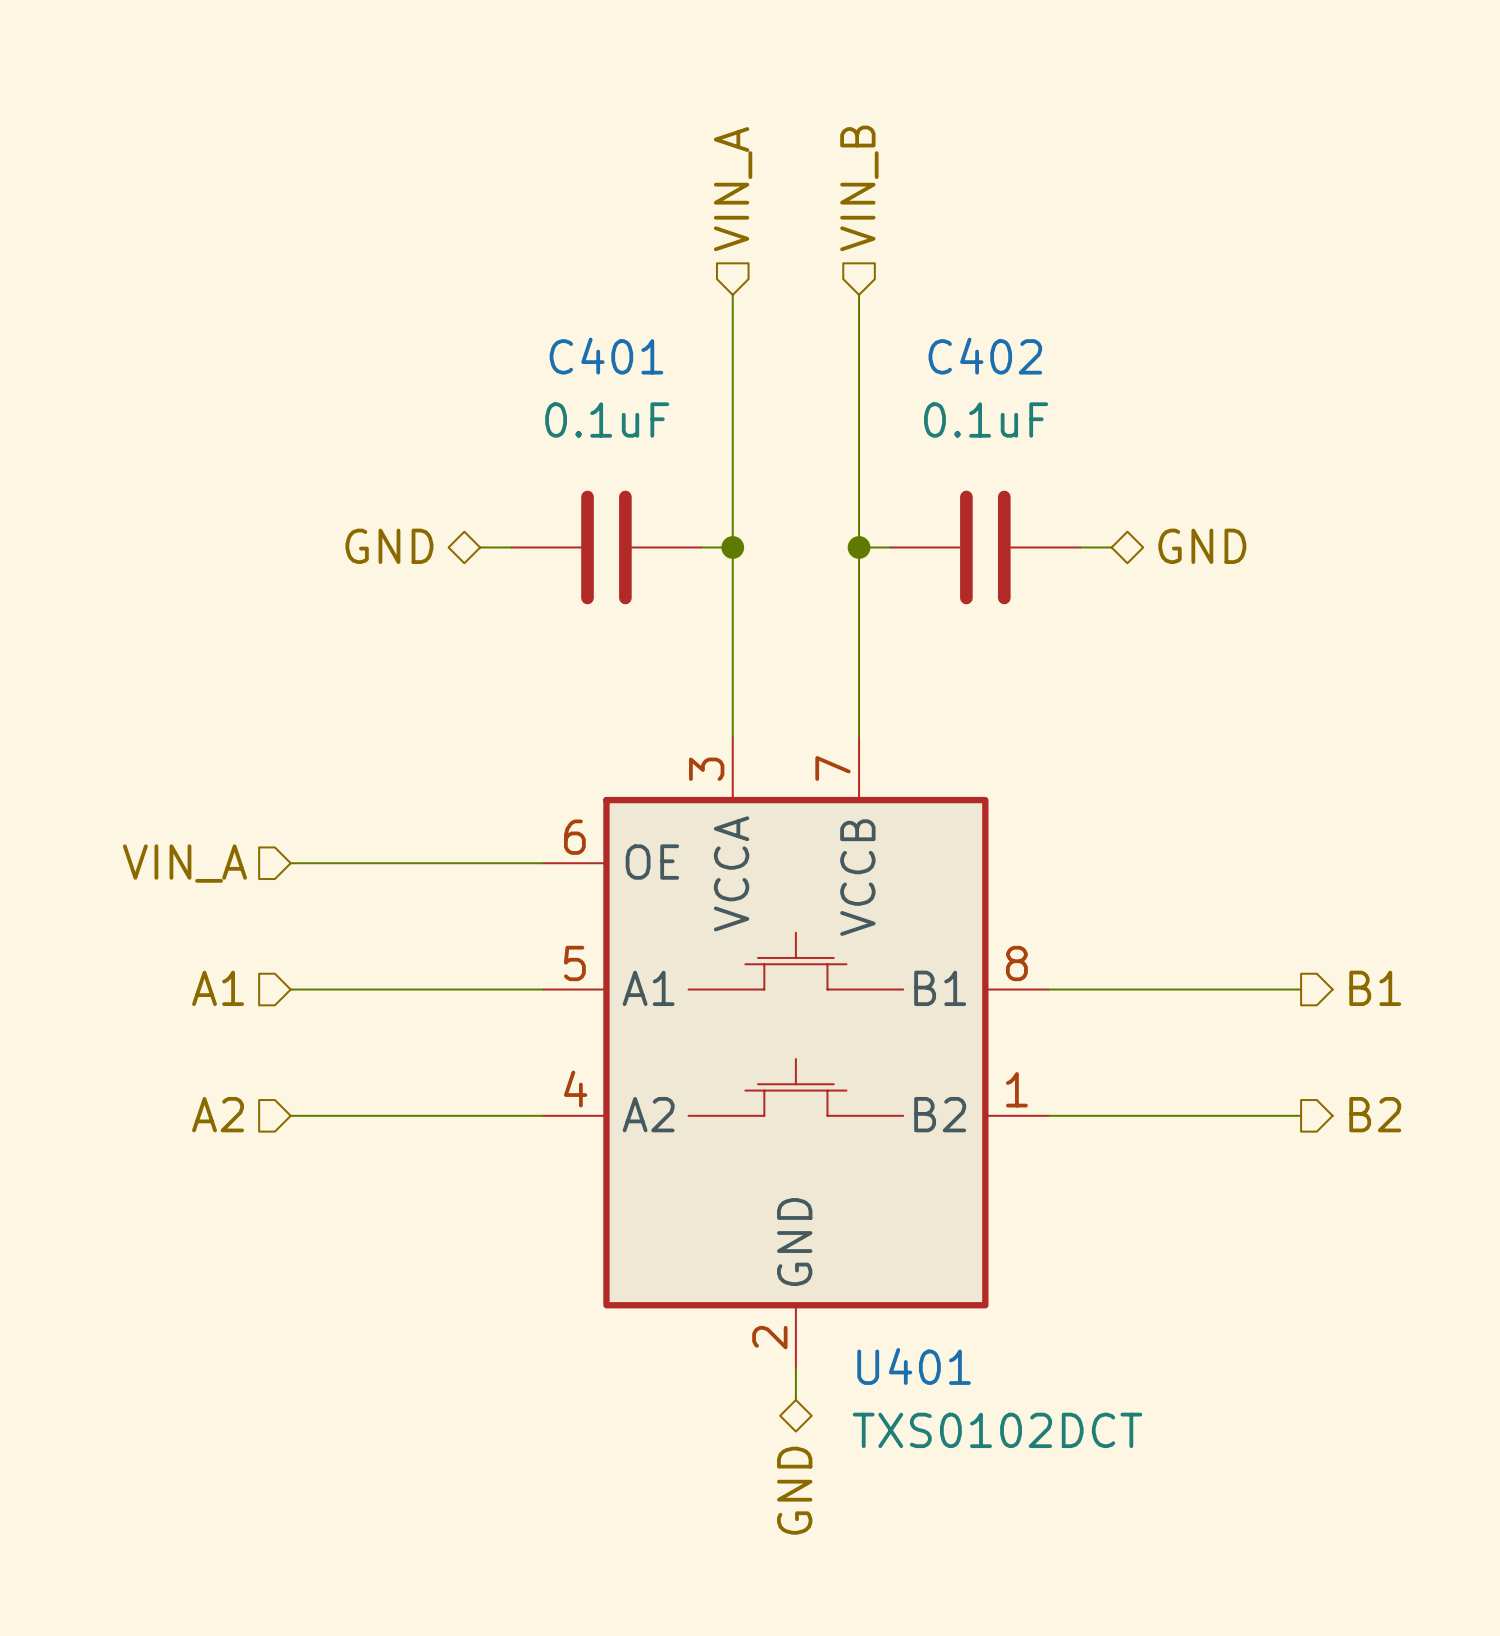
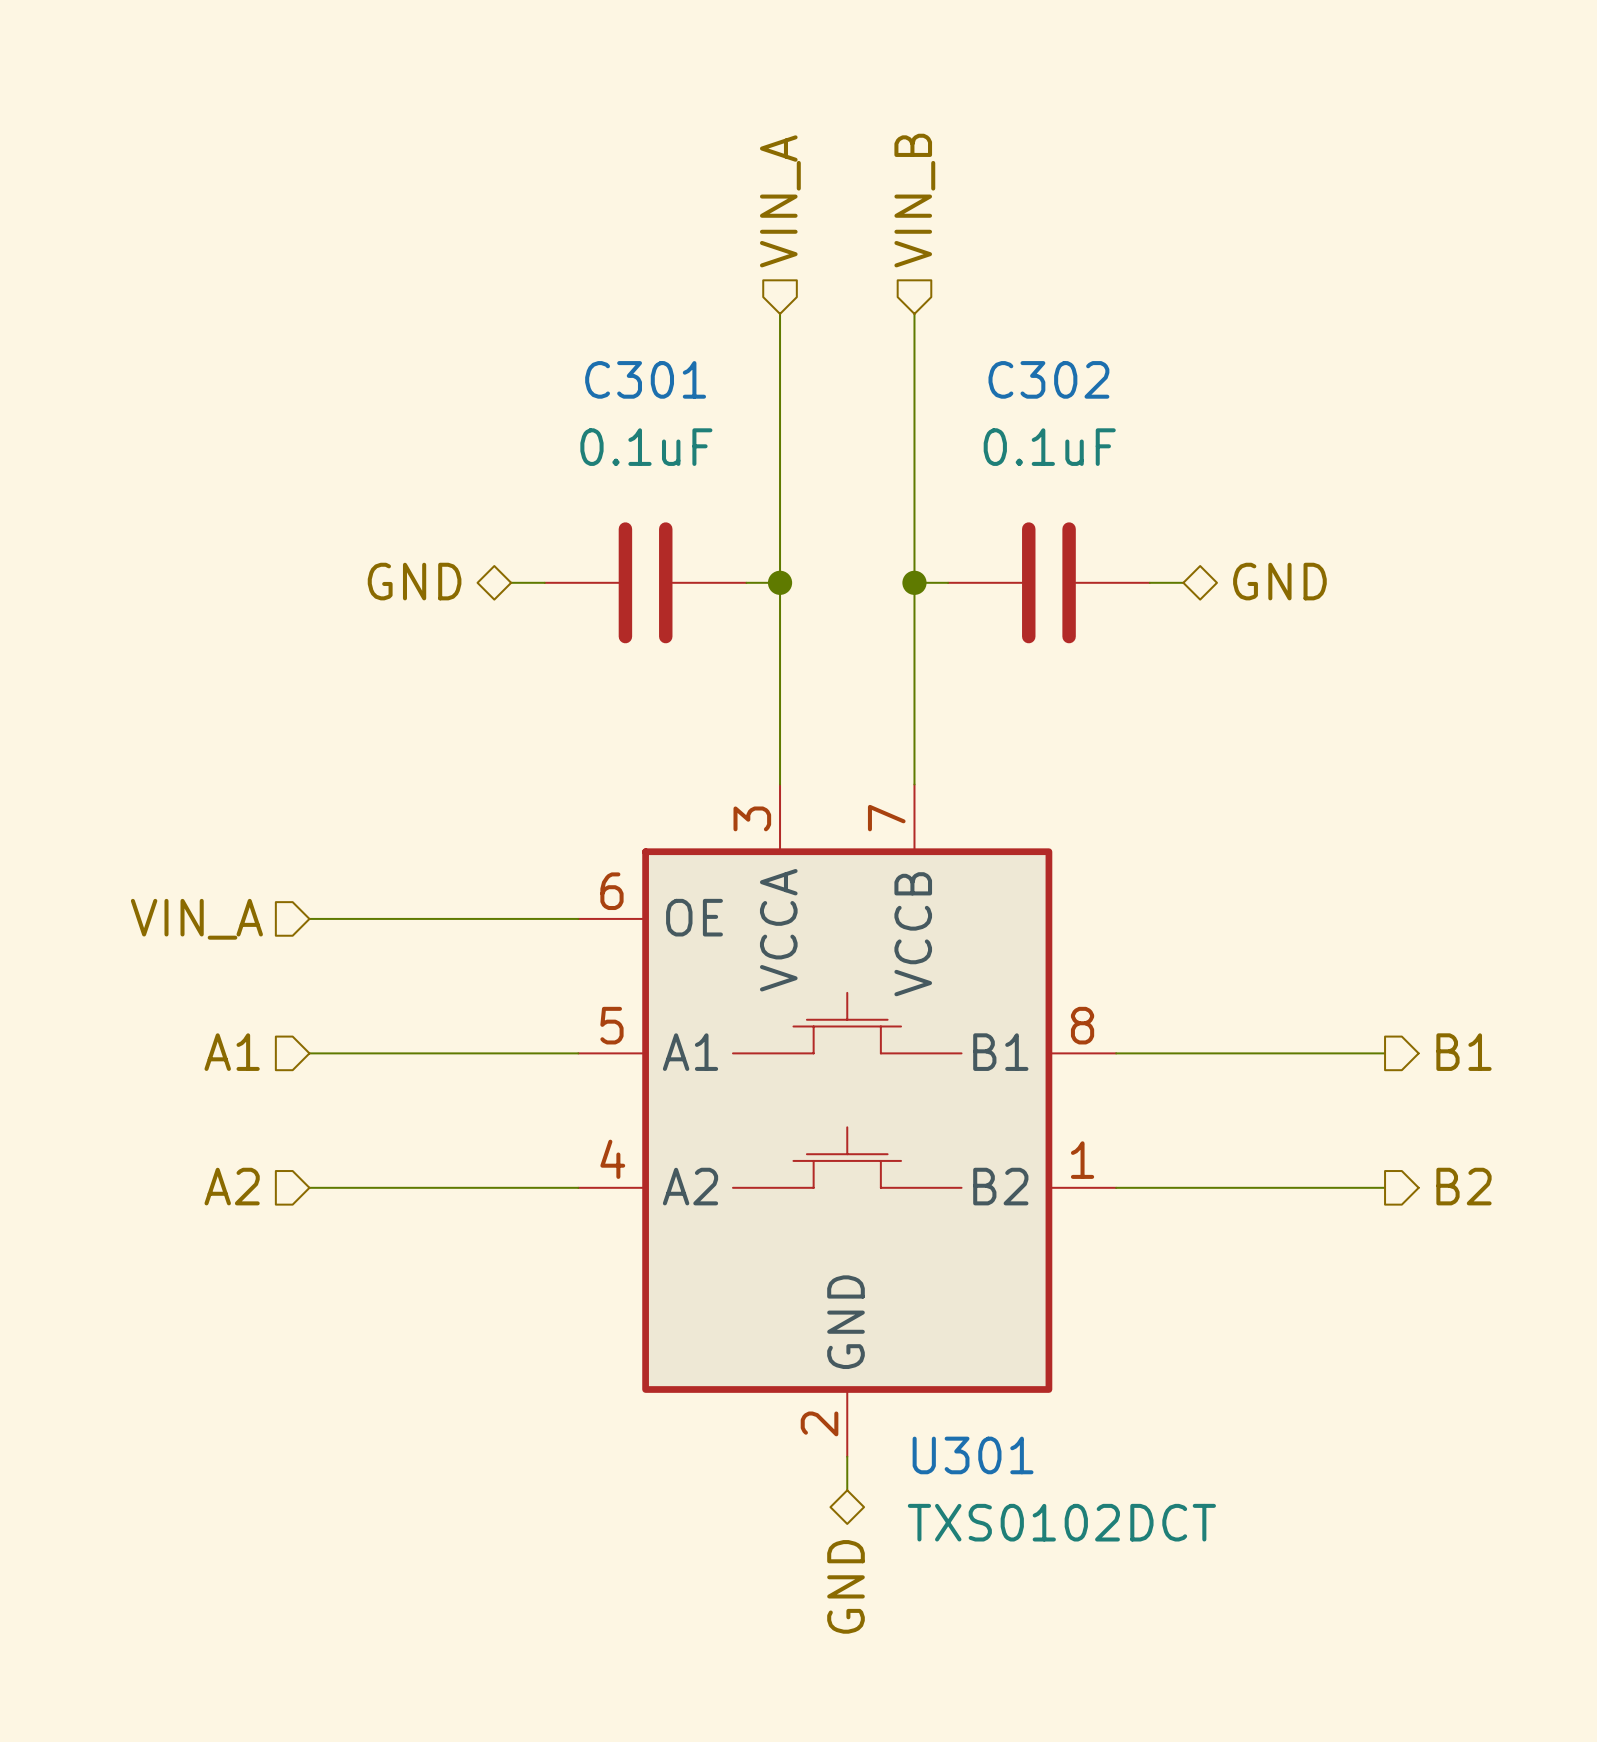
C401 name: C401 (606, 356) -> C301 (645, 379)
C402 name: C402 (985, 356) -> C302 (1048, 379)
U401 name: U401 (914, 1366) -> U301 (973, 1455)

